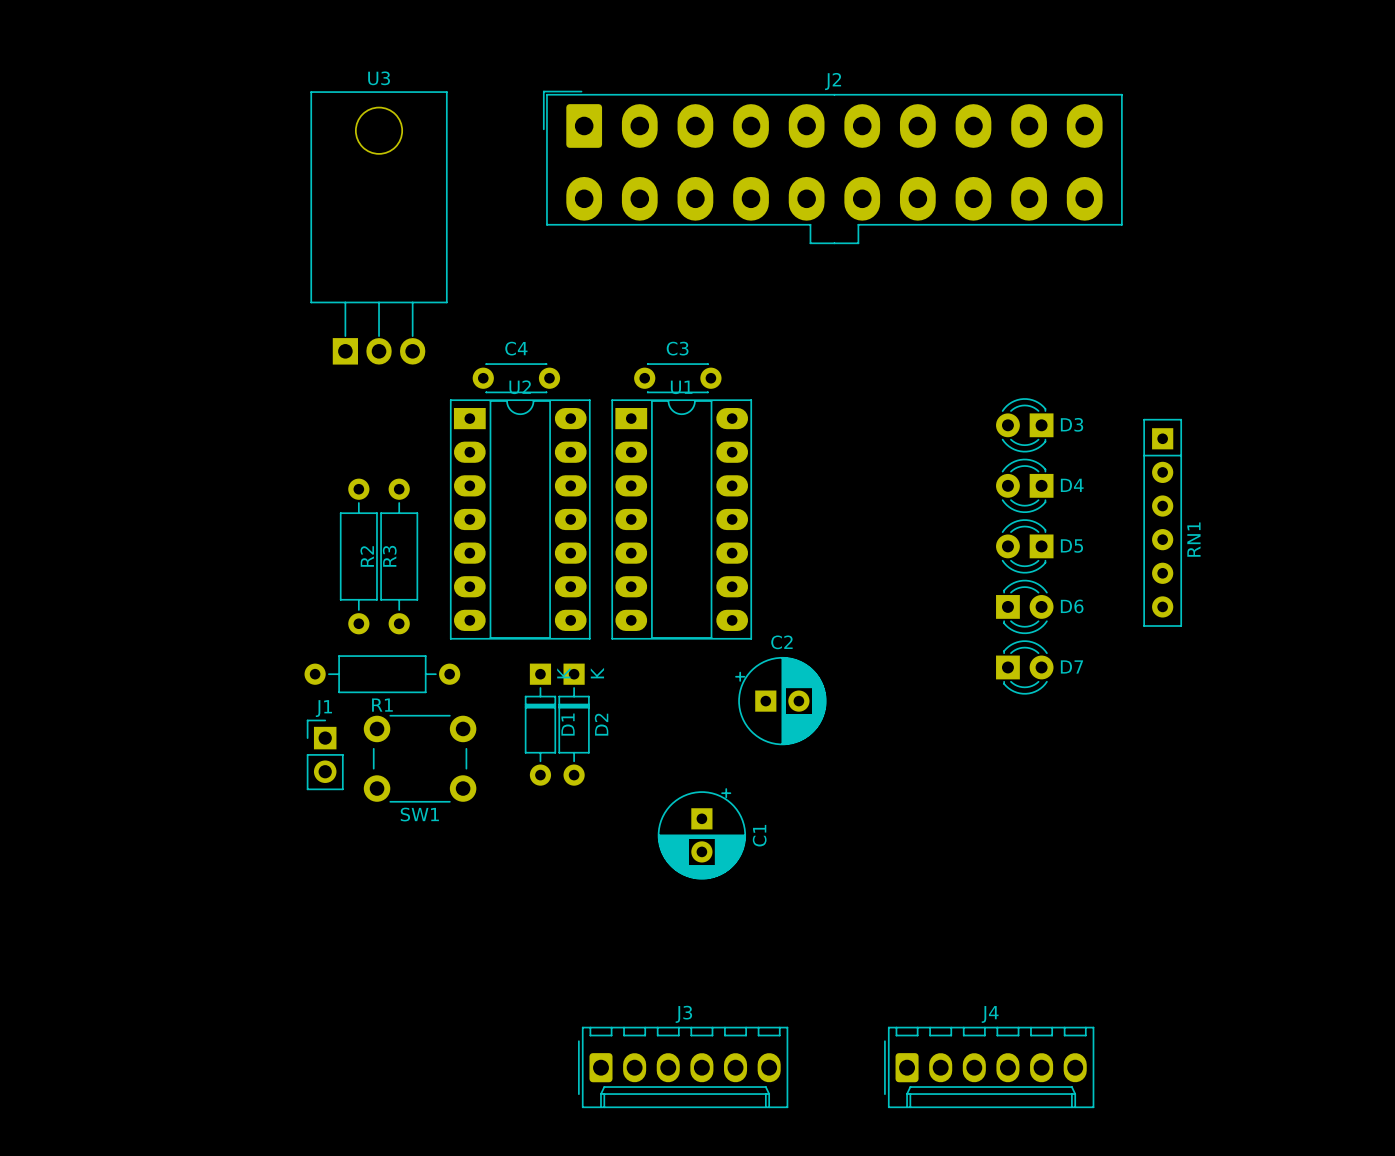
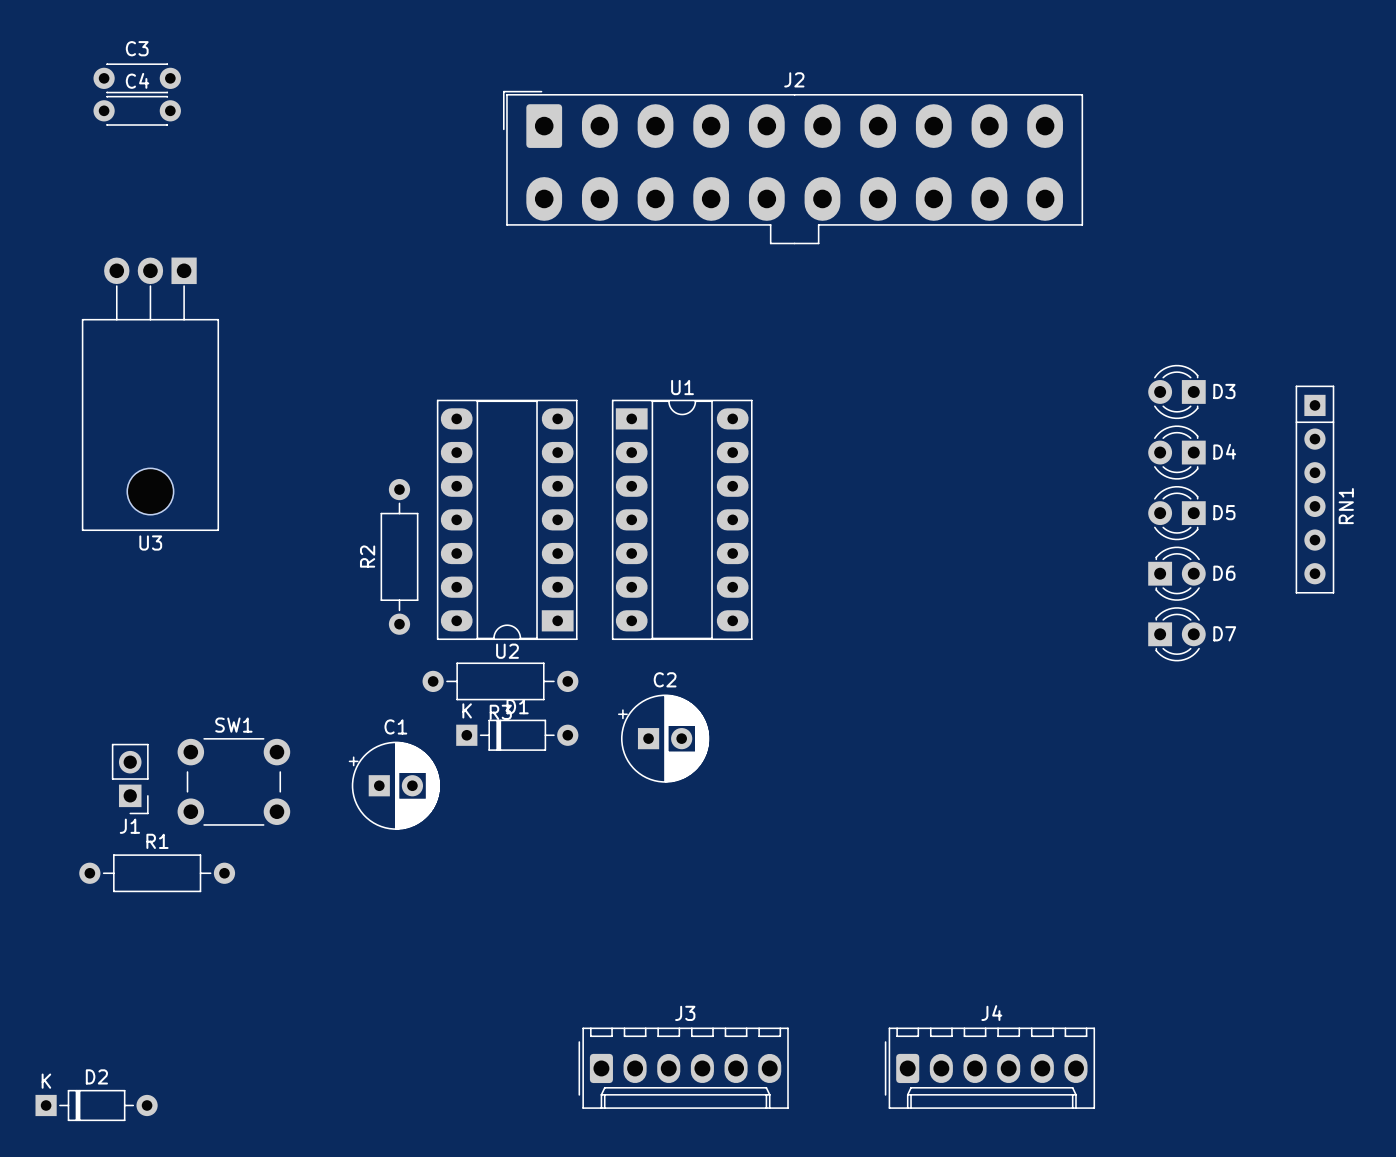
J2 position: (832, 167) -> (793, 167)
U3 rotation: 0° (379, 227) -> 180° (150, 394)
U3 position: (379, 227) -> (150, 394)
C4 position: (516, 378) -> (137, 110)
C3 position: (677, 378) -> (137, 78)
D3 position: (1024, 425) -> (1176, 391)
D4 position: (1024, 485) -> (1176, 452)
U2 rotation: 0° (520, 519) -> 180° (507, 519)
RN1 position: (1162, 522) -> (1314, 489)
D5 position: (1024, 546) -> (1176, 513)
R3 rotation: 0° (358, 556) -> 90° clockwise (500, 681)
R3 position: (358, 556) -> (500, 681)
D6 position: (1024, 606) -> (1176, 573)
D7 position: (1024, 667) -> (1176, 634)
R1 position: (382, 674) -> (157, 873)
C2 position: (780, 701) -> (663, 738)
R1 name position: R1 (382, 705) -> R1 (157, 841)
D1 rotation: 0° (540, 724) -> 90° counterclockwise (517, 735)
D2 rotation: 0° (574, 724) -> 90° counterclockwise (96, 1105)
D2 position: (574, 724) -> (96, 1105)
J1 rotation: 0° (325, 754) -> 180° (130, 779)
J1 position: (325, 754) -> (130, 779)
SW1 position: (420, 758) -> (233, 781)
SW1 name position: SW1 (419, 814) -> SW1 (233, 725)
C1 rotation: 0° (701, 833) -> 90° counterclockwise (394, 785)
C1 position: (701, 833) -> (394, 785)

